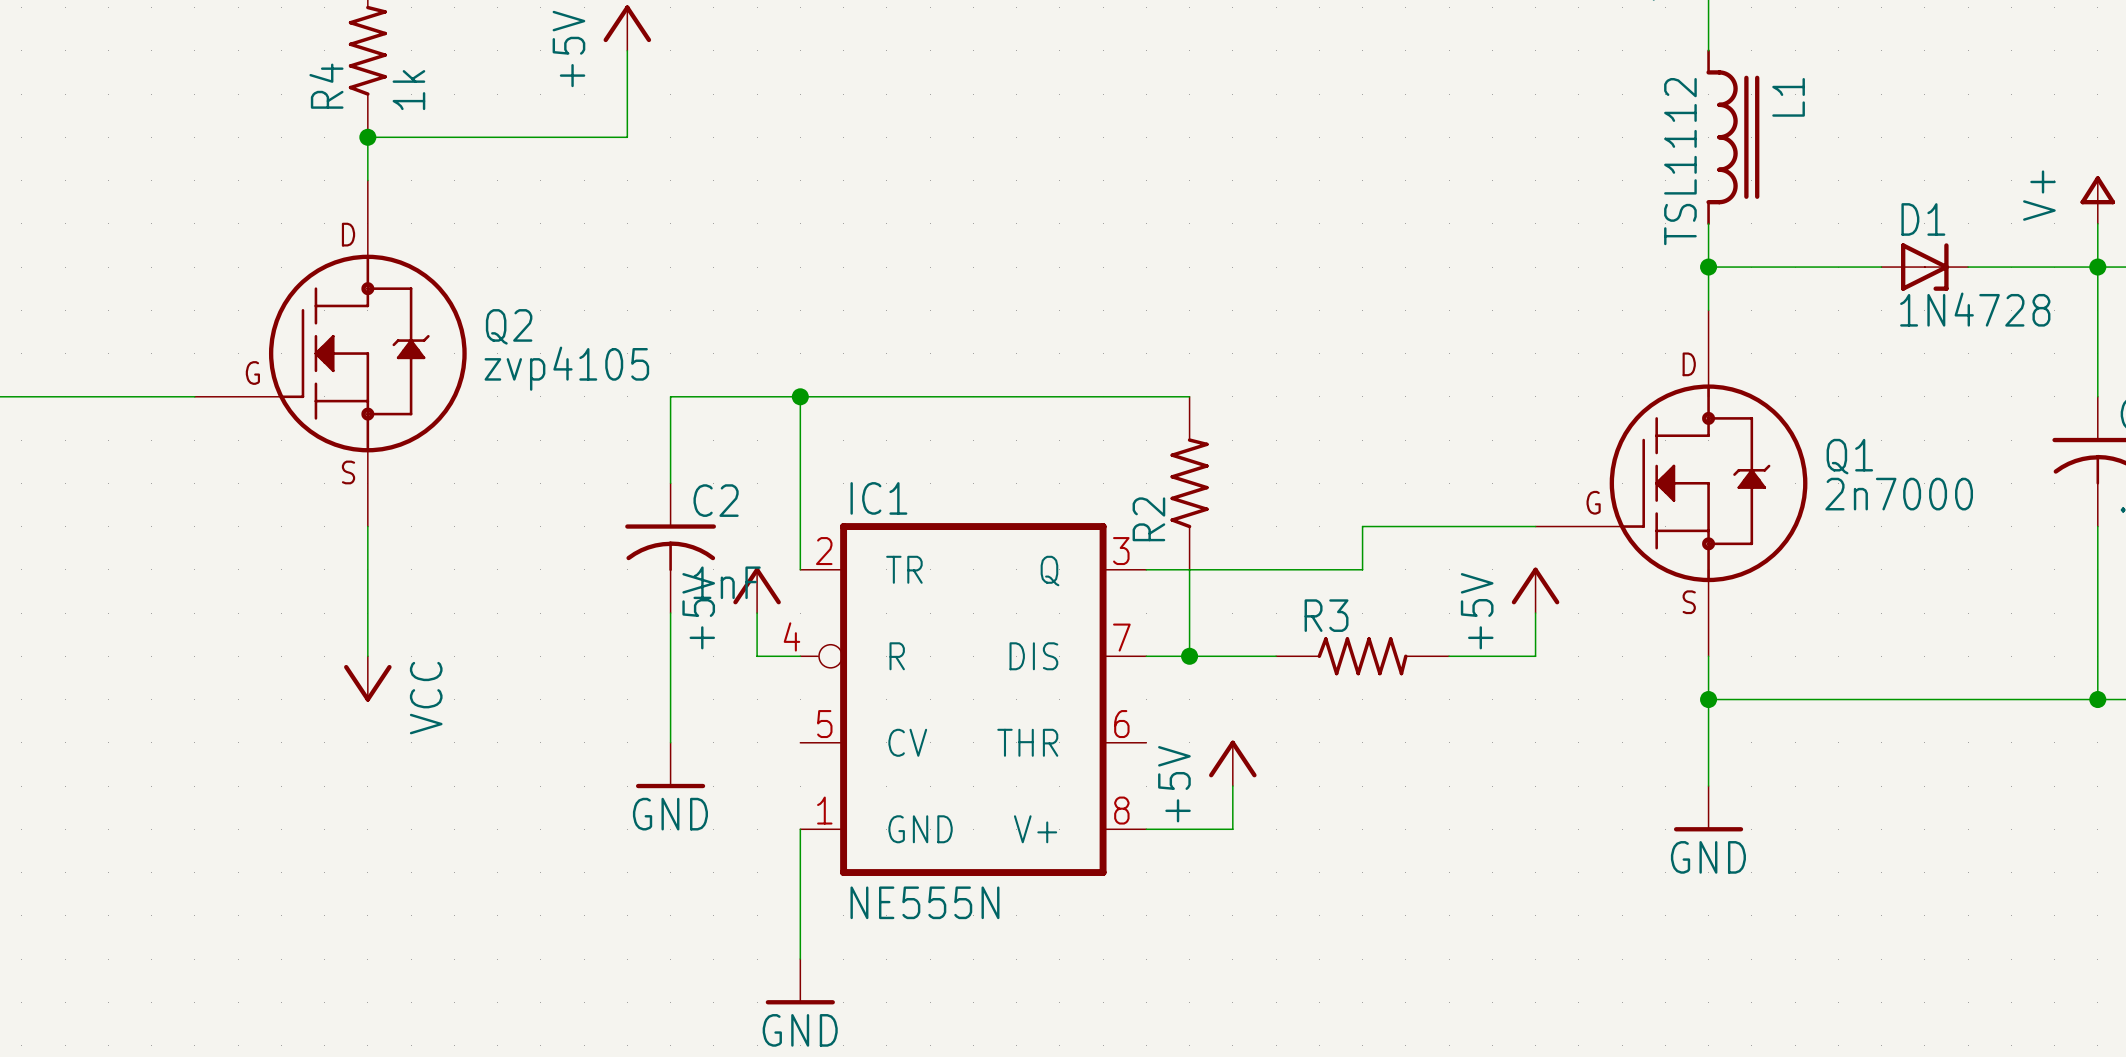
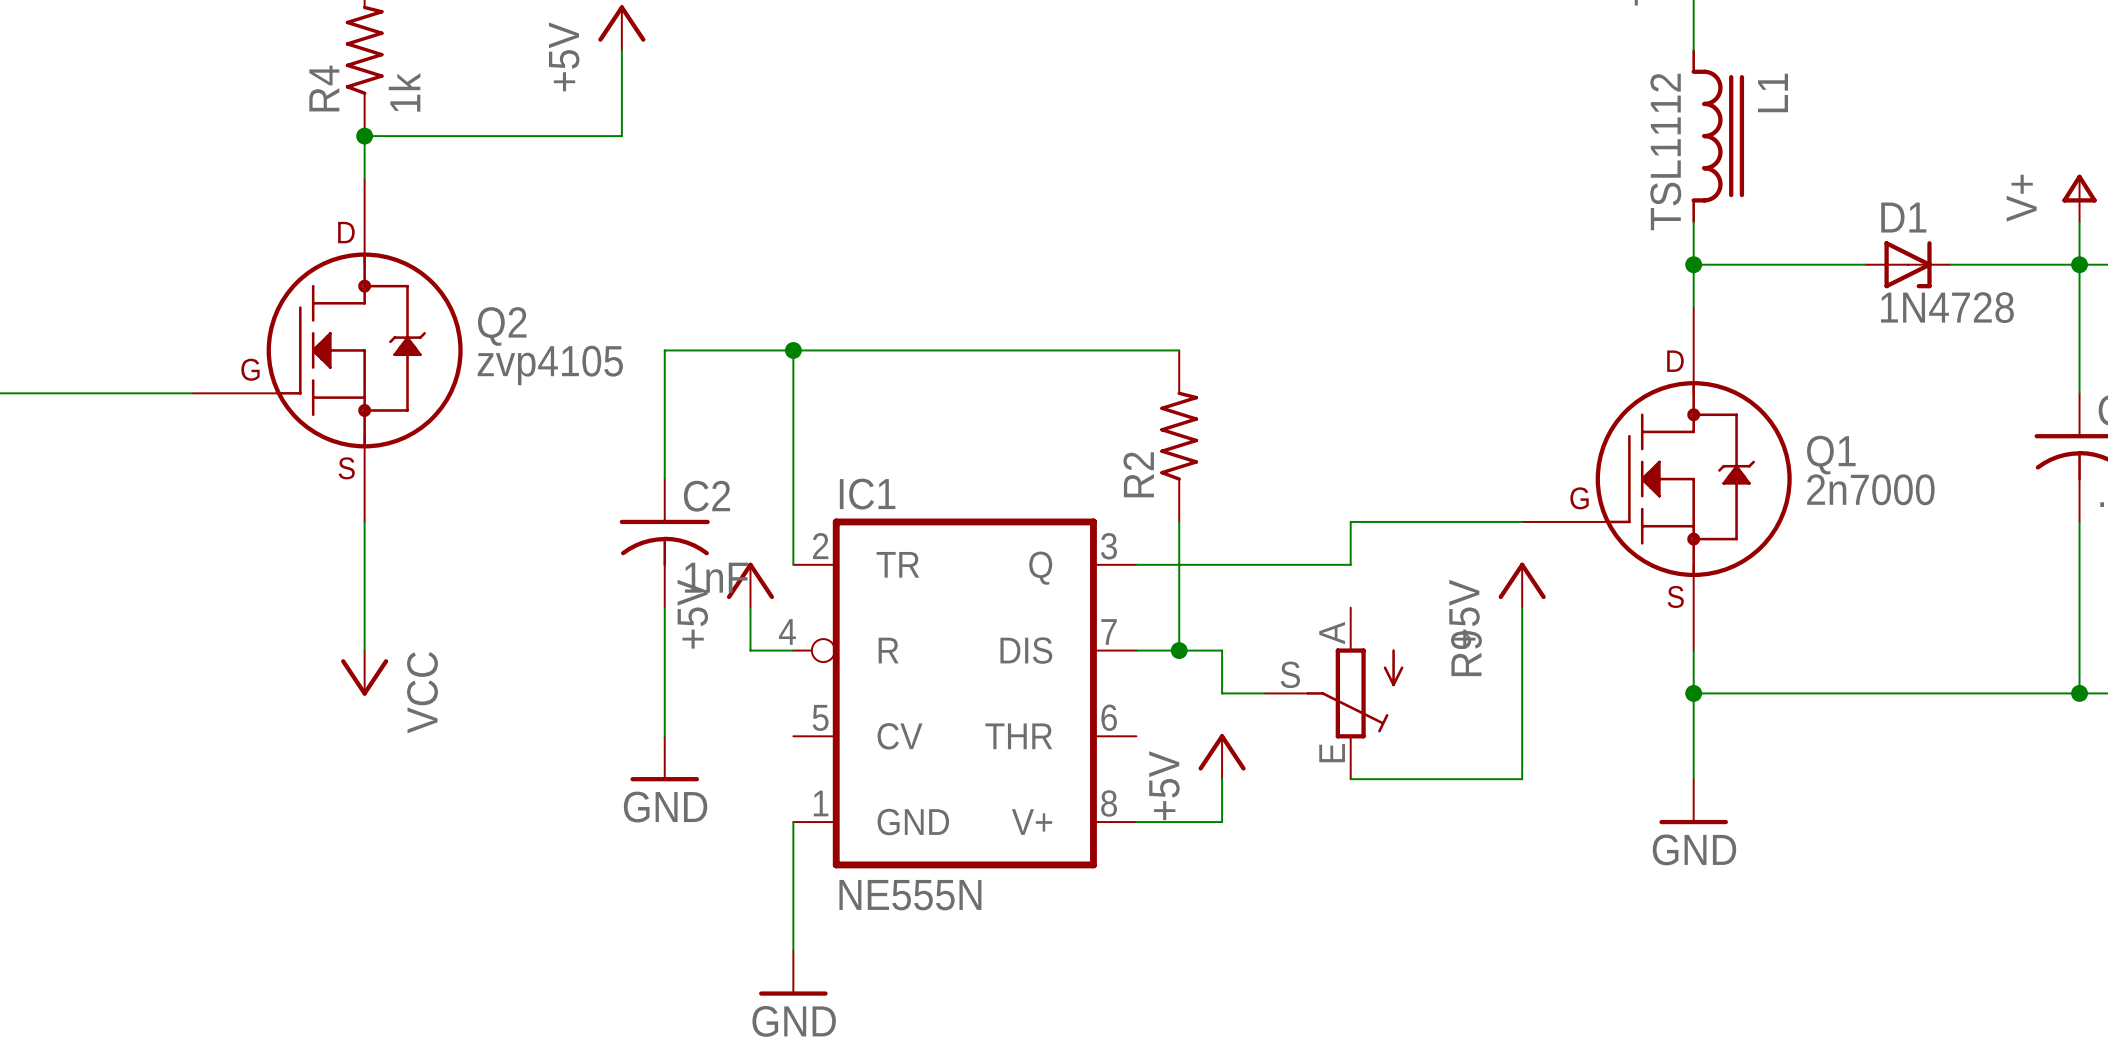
wire: none -> (793, 350) (793, 393)
wire: (670, 396) (1189, 396) -> (664, 393) (664, 350) (1179, 350)
junction position: (800, 396) -> (793, 350)
R2 position: (1189, 483) -> (1179, 436)
wire: (1232, 656) (1276, 656) -> (1222, 650) (1222, 693) (1264, 693)
R3: (1362, 656) -> none
wire: (1449, 656) (1535, 656) -> (1350, 779) (1522, 779) (1522, 650)
R9: none -> (1334, 693)

